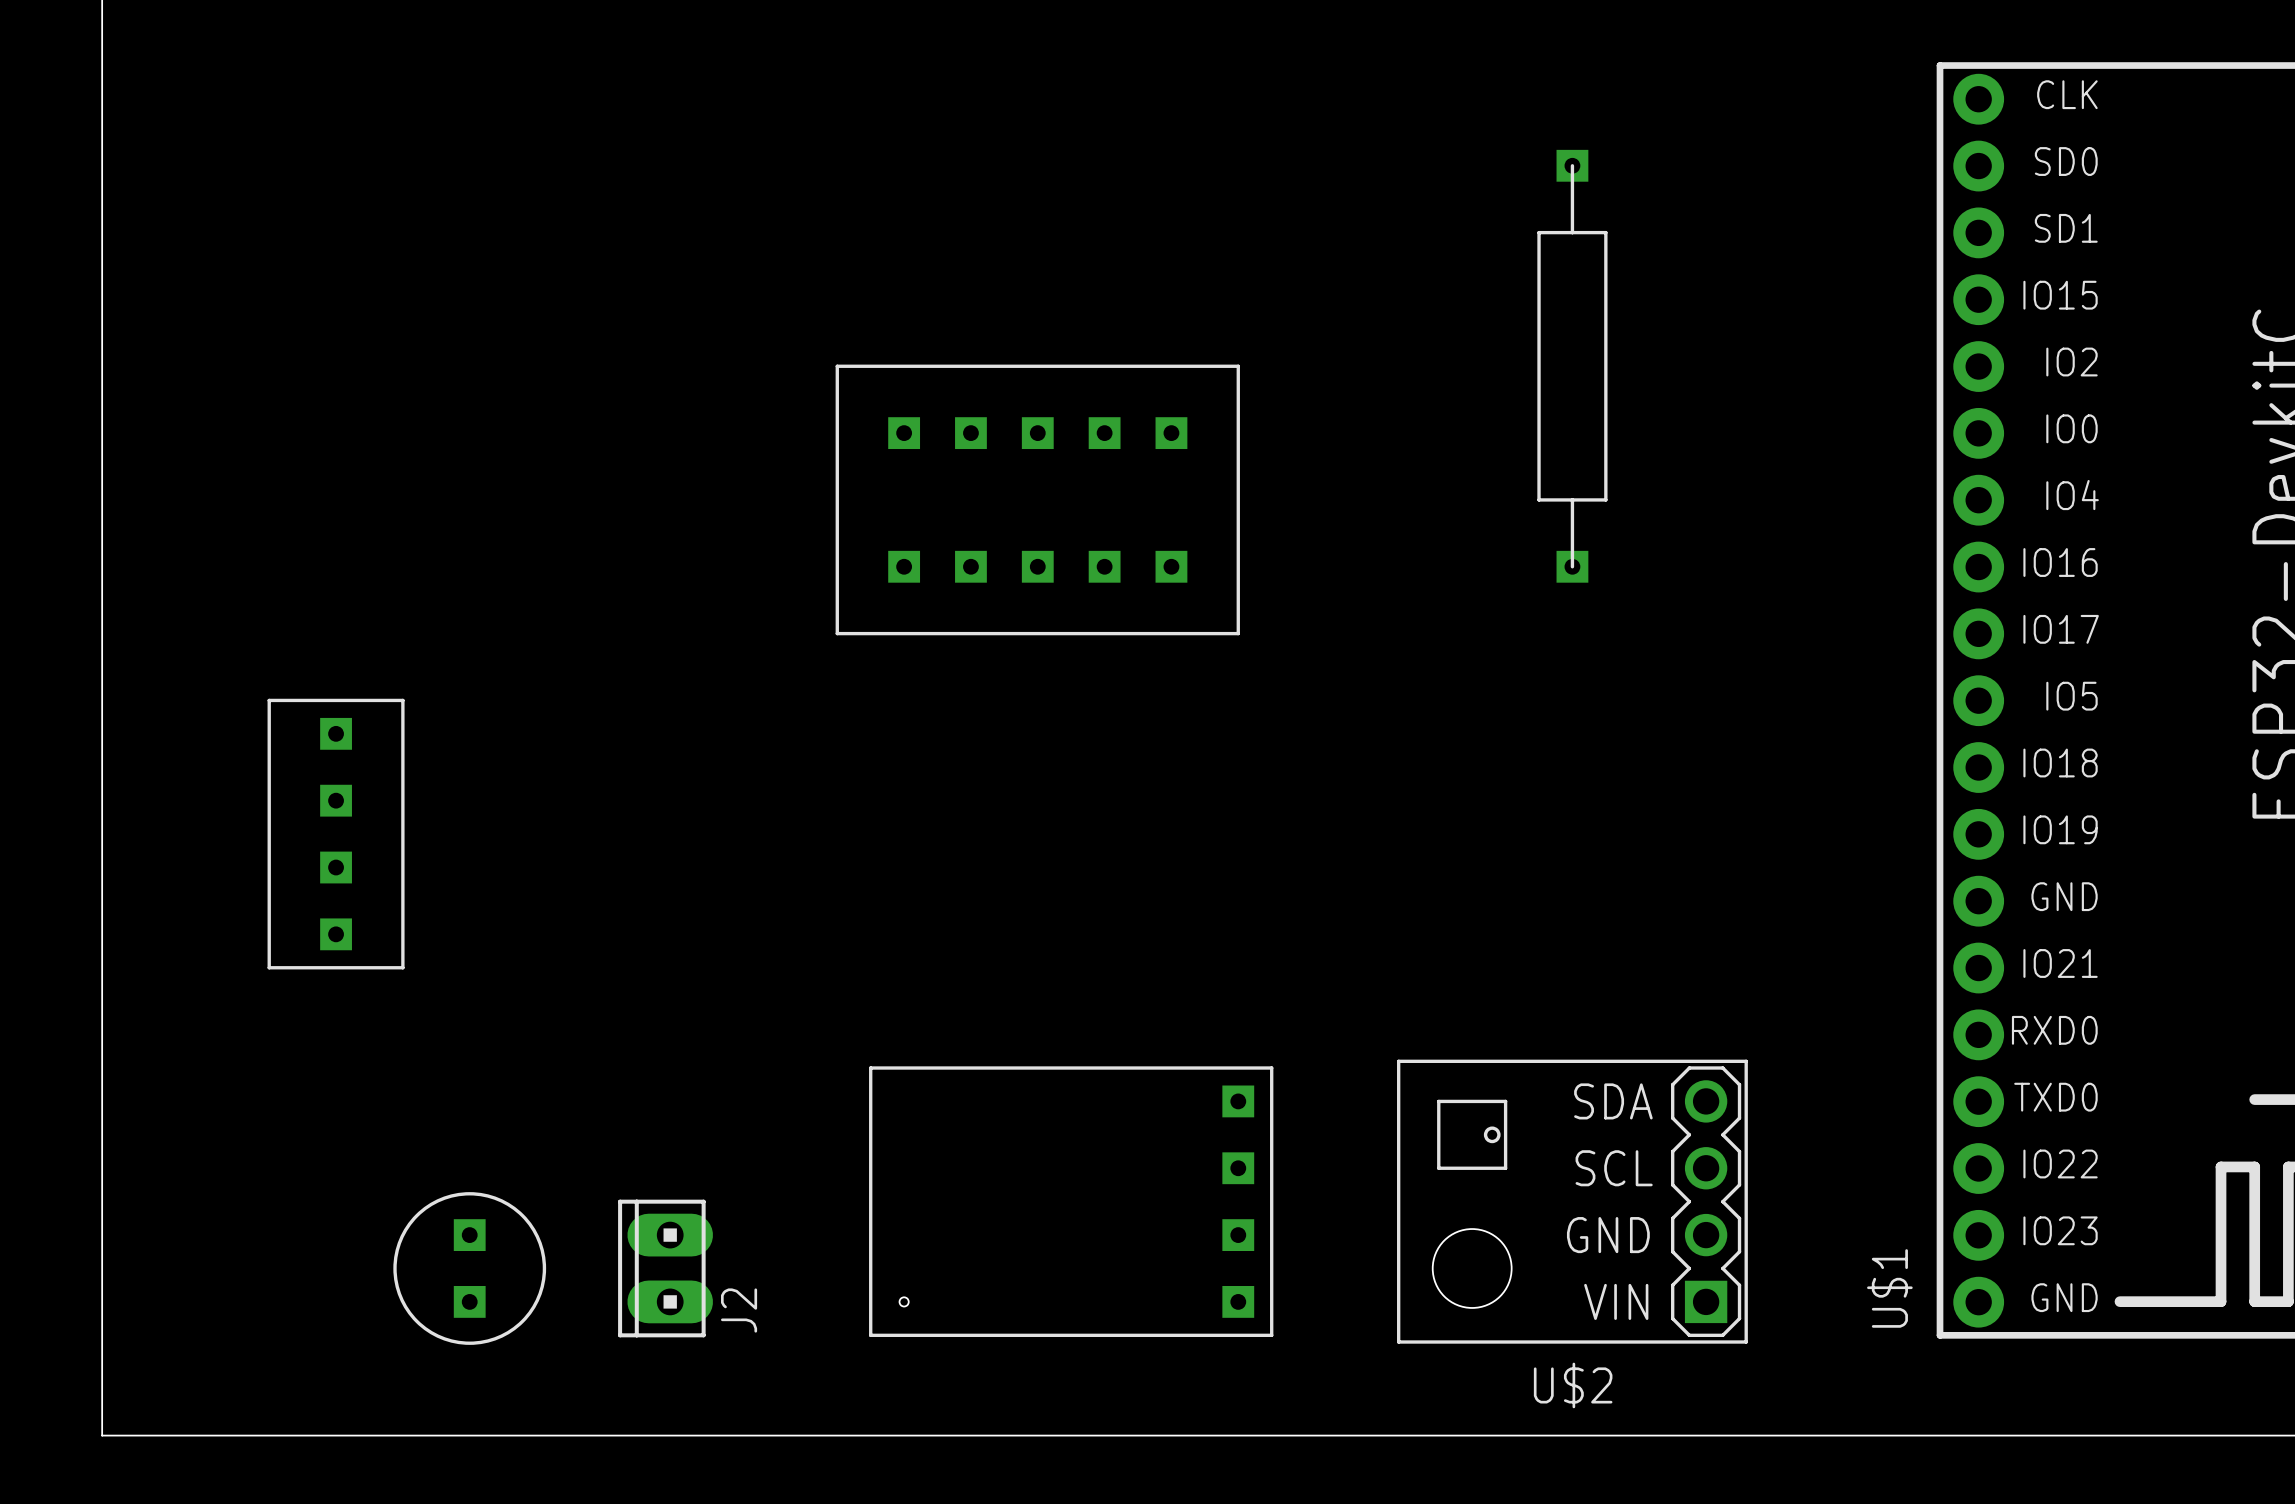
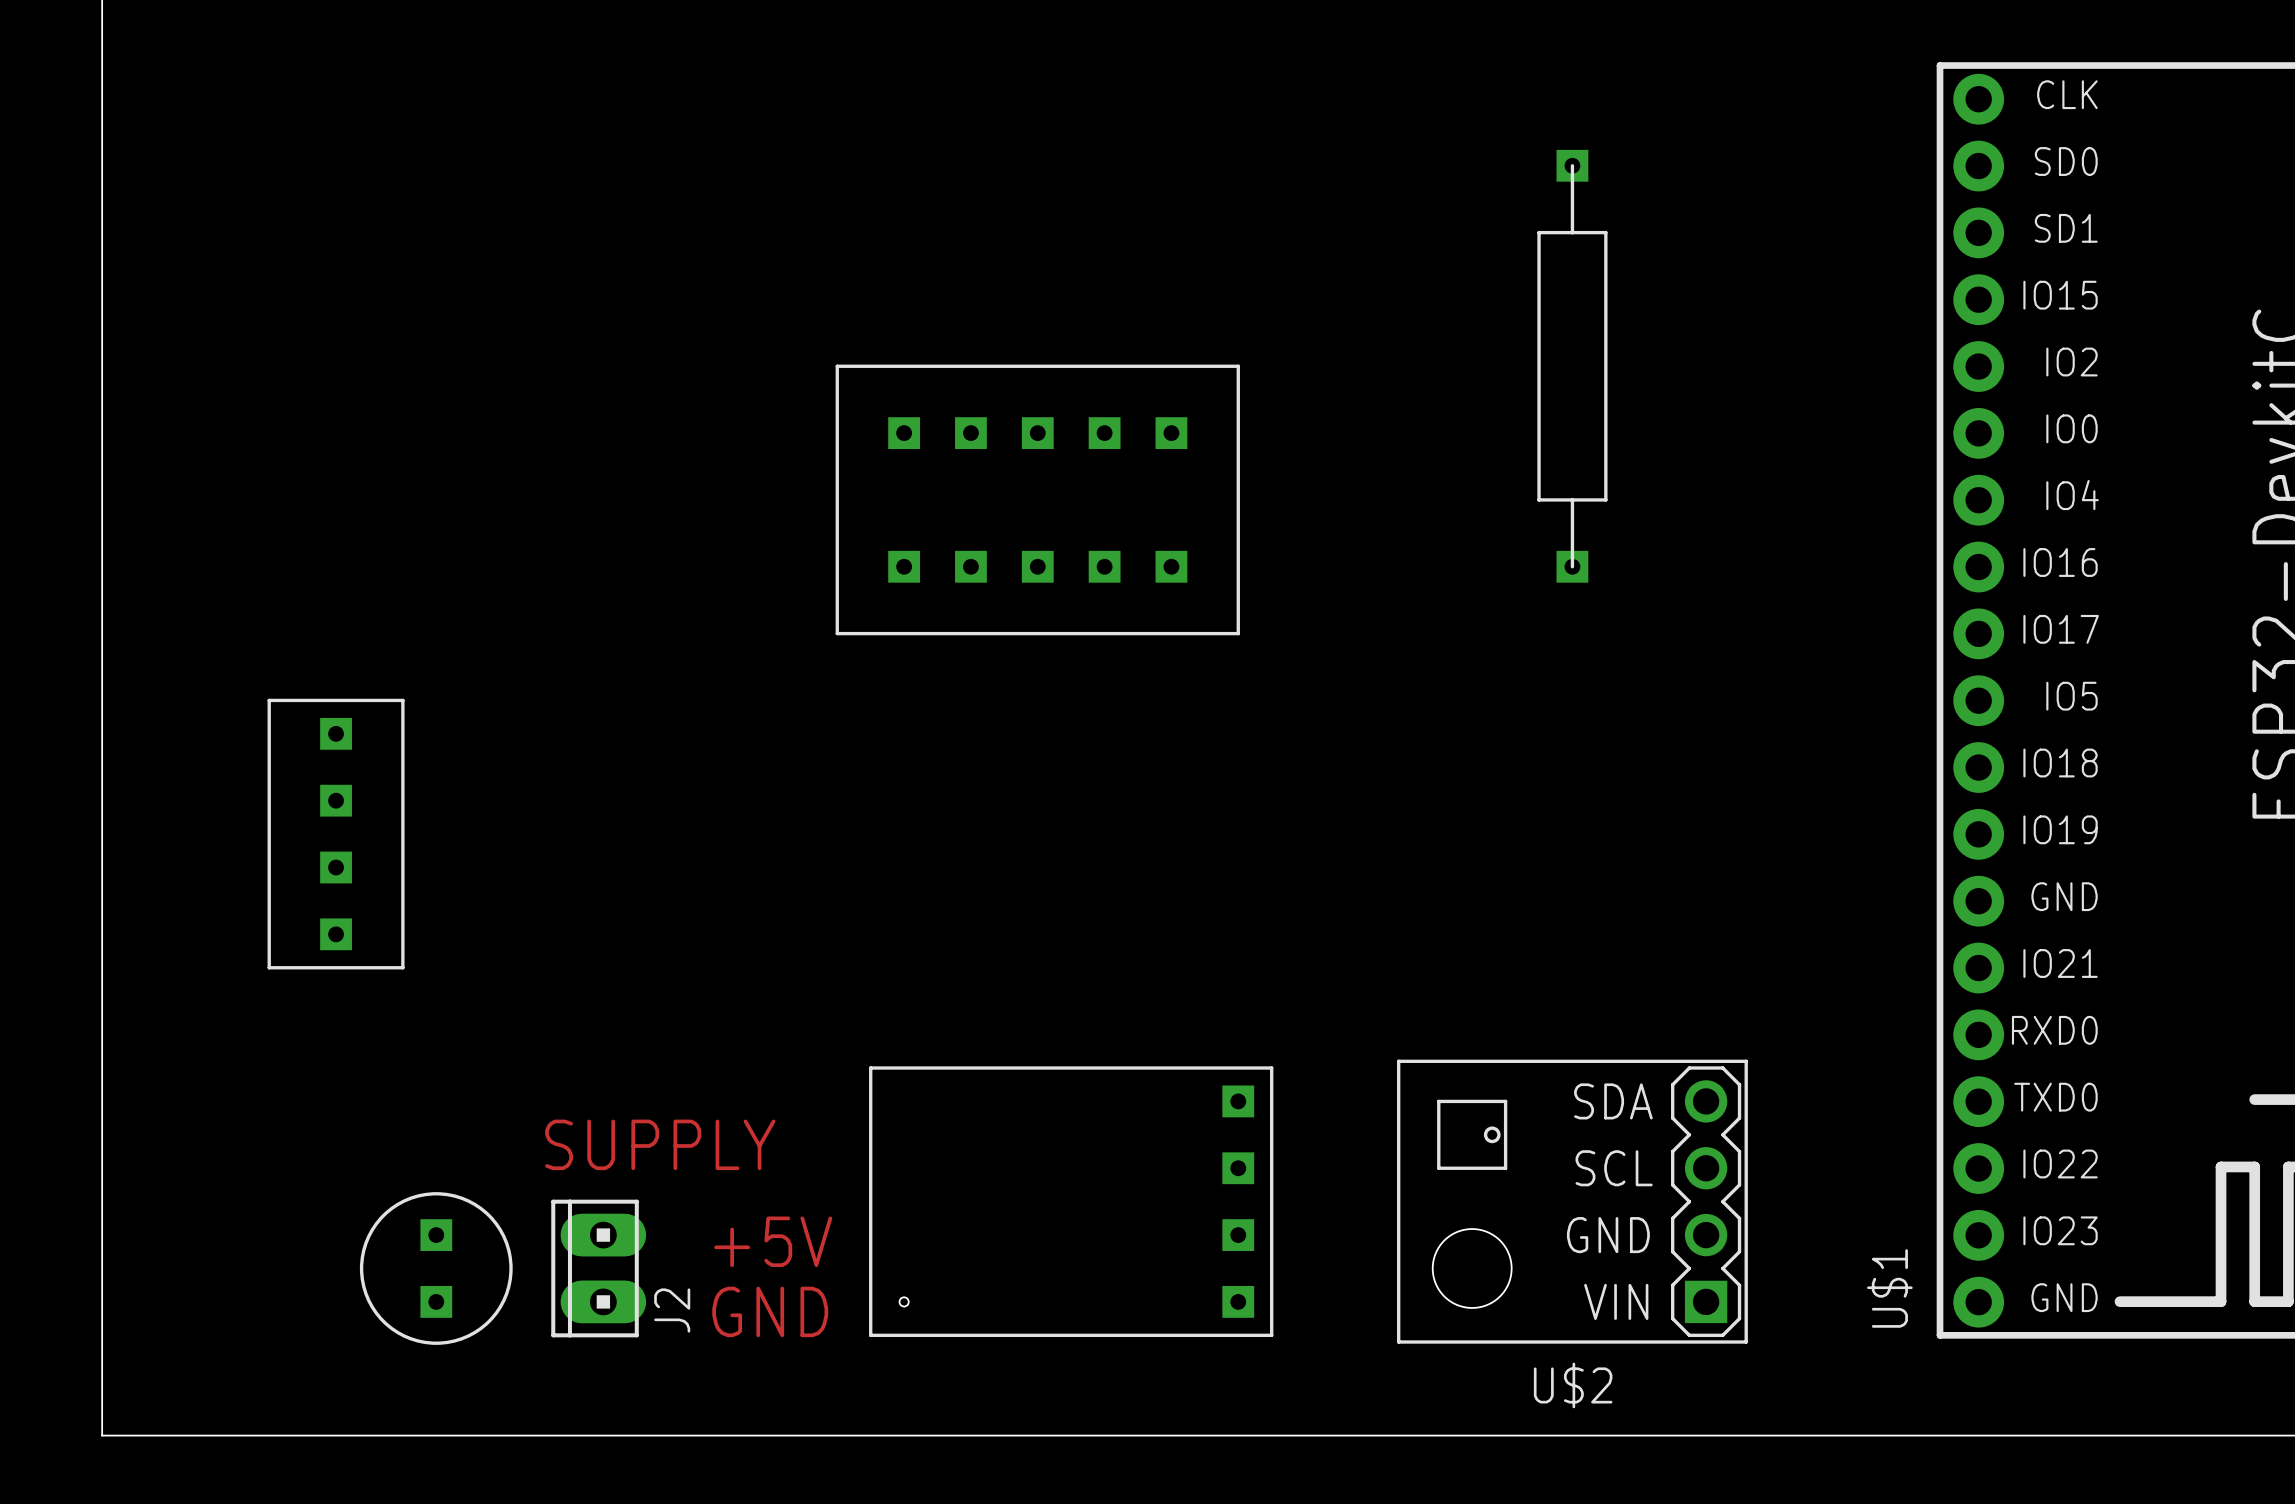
text: none -> SUPPLY (660, 1144)
text: none -> +5V (773, 1241)
part position: (469, 1268) -> (436, 1268)
J2 position: (665, 1268) -> (598, 1268)
text: none -> GND (770, 1311)

